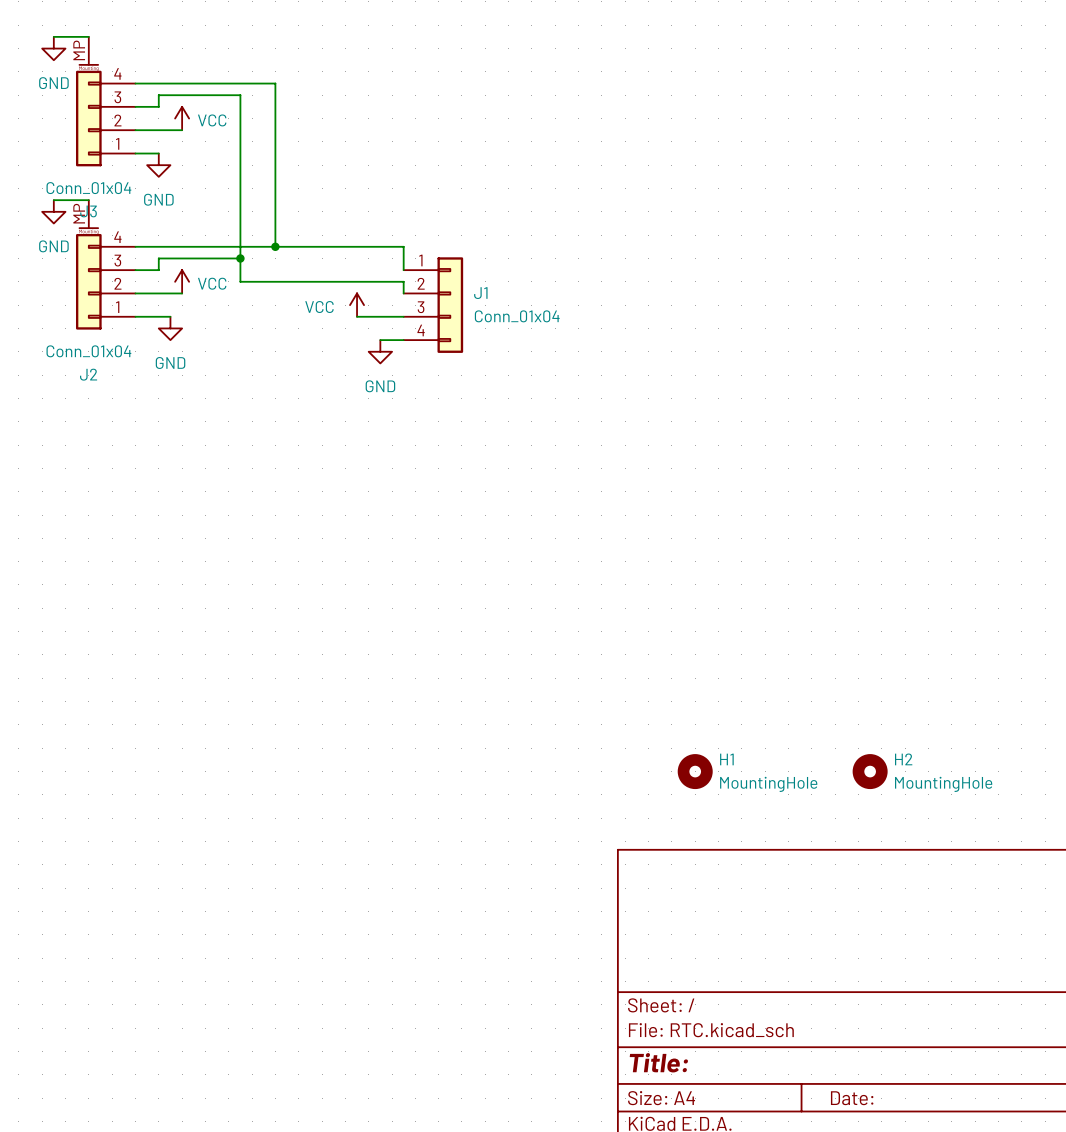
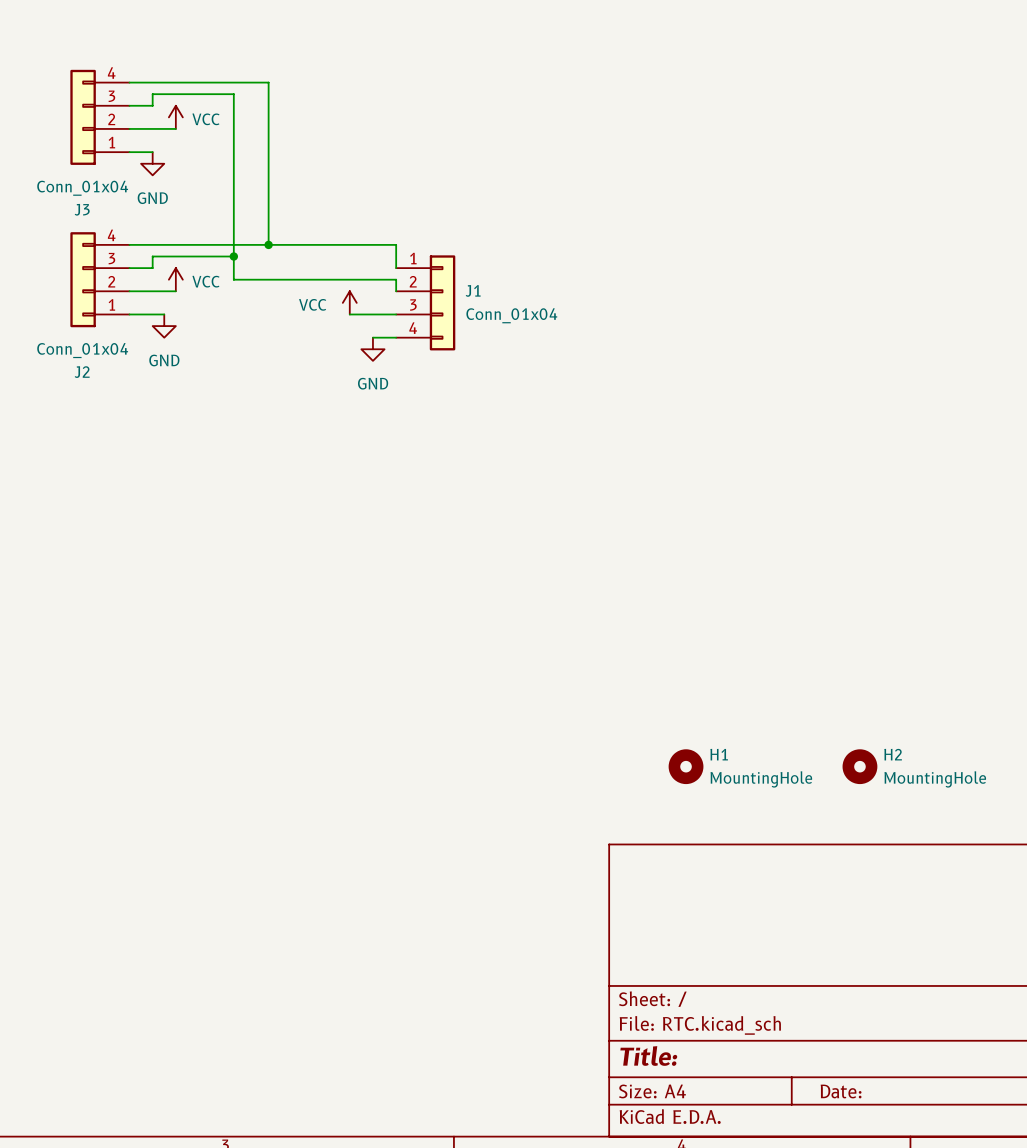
wire: (53, 36) (88, 36) -> none
J3 symbol: [75, 36, 136, 167] -> [70, 69, 130, 165]
power symbol: GND (53, 48) -> none
wire: (53, 200) (88, 200) -> none
J2 symbol: [75, 200, 136, 330] -> [70, 232, 130, 328]
power symbol: GND (53, 211) -> none

